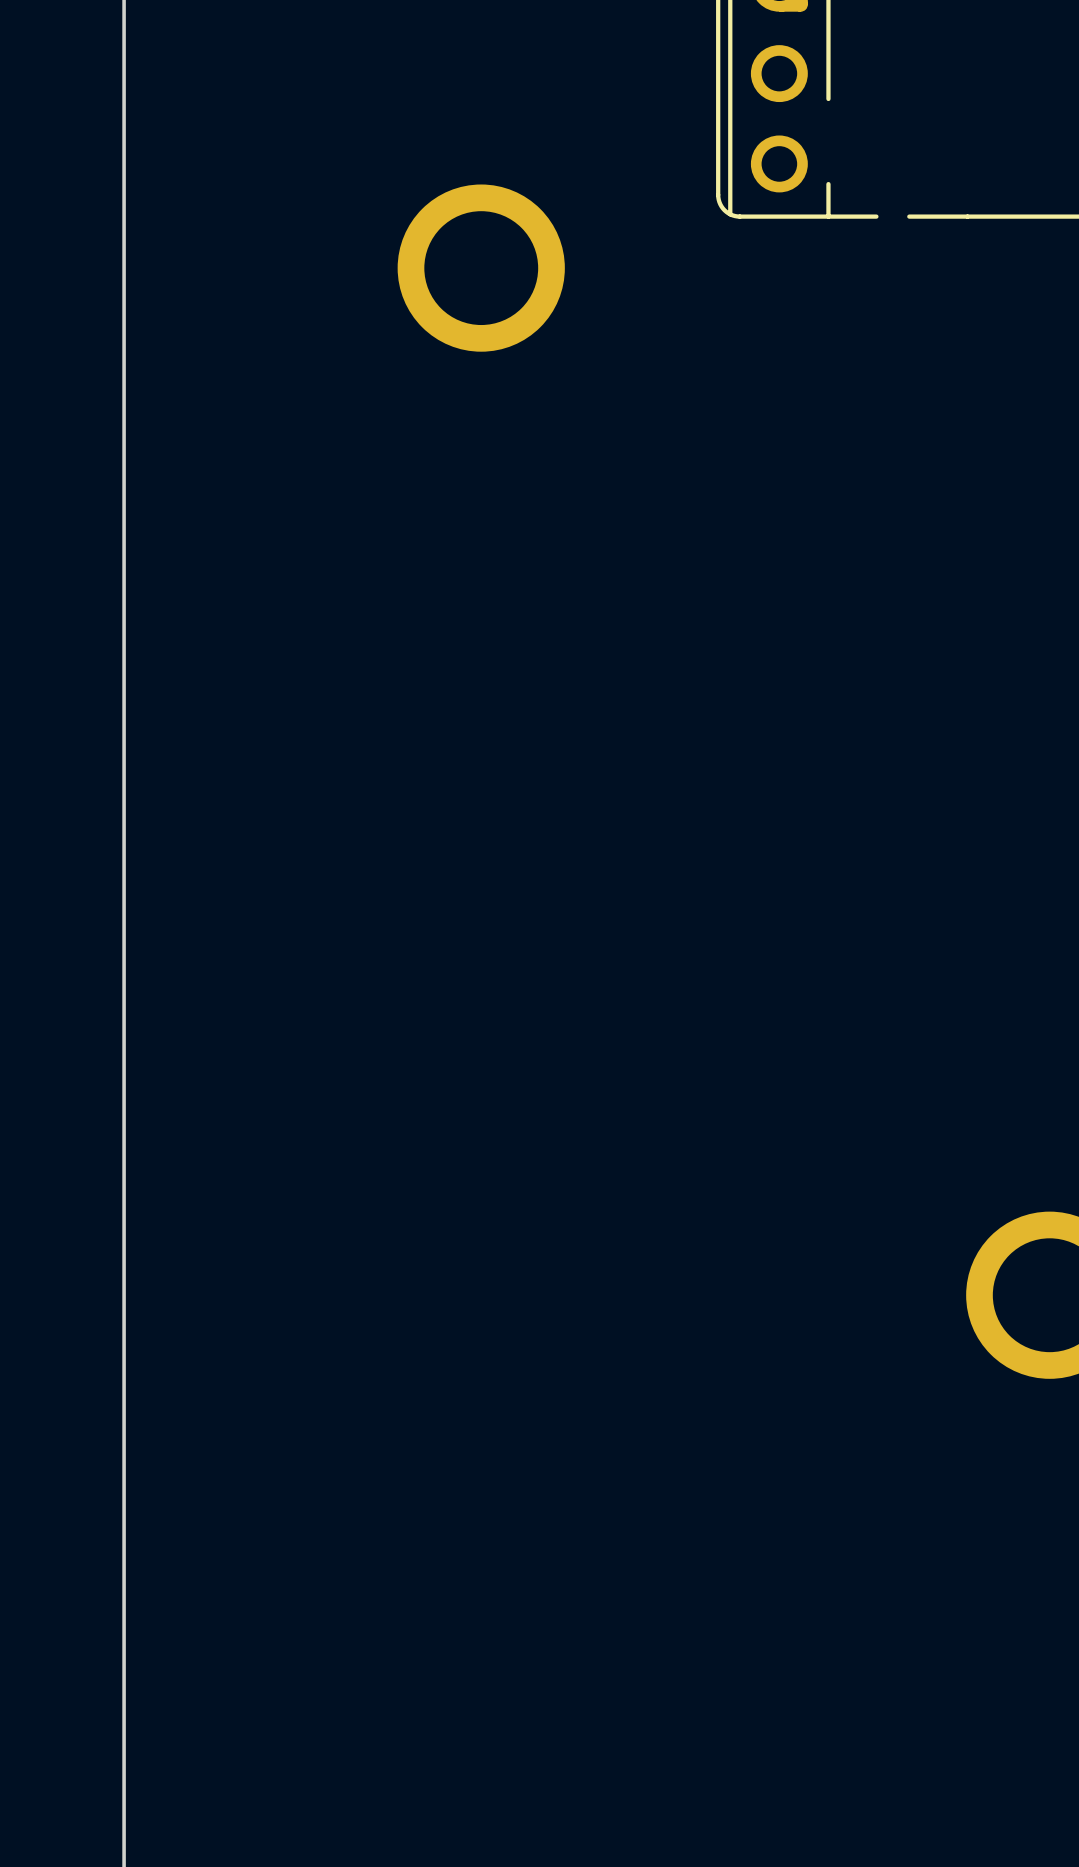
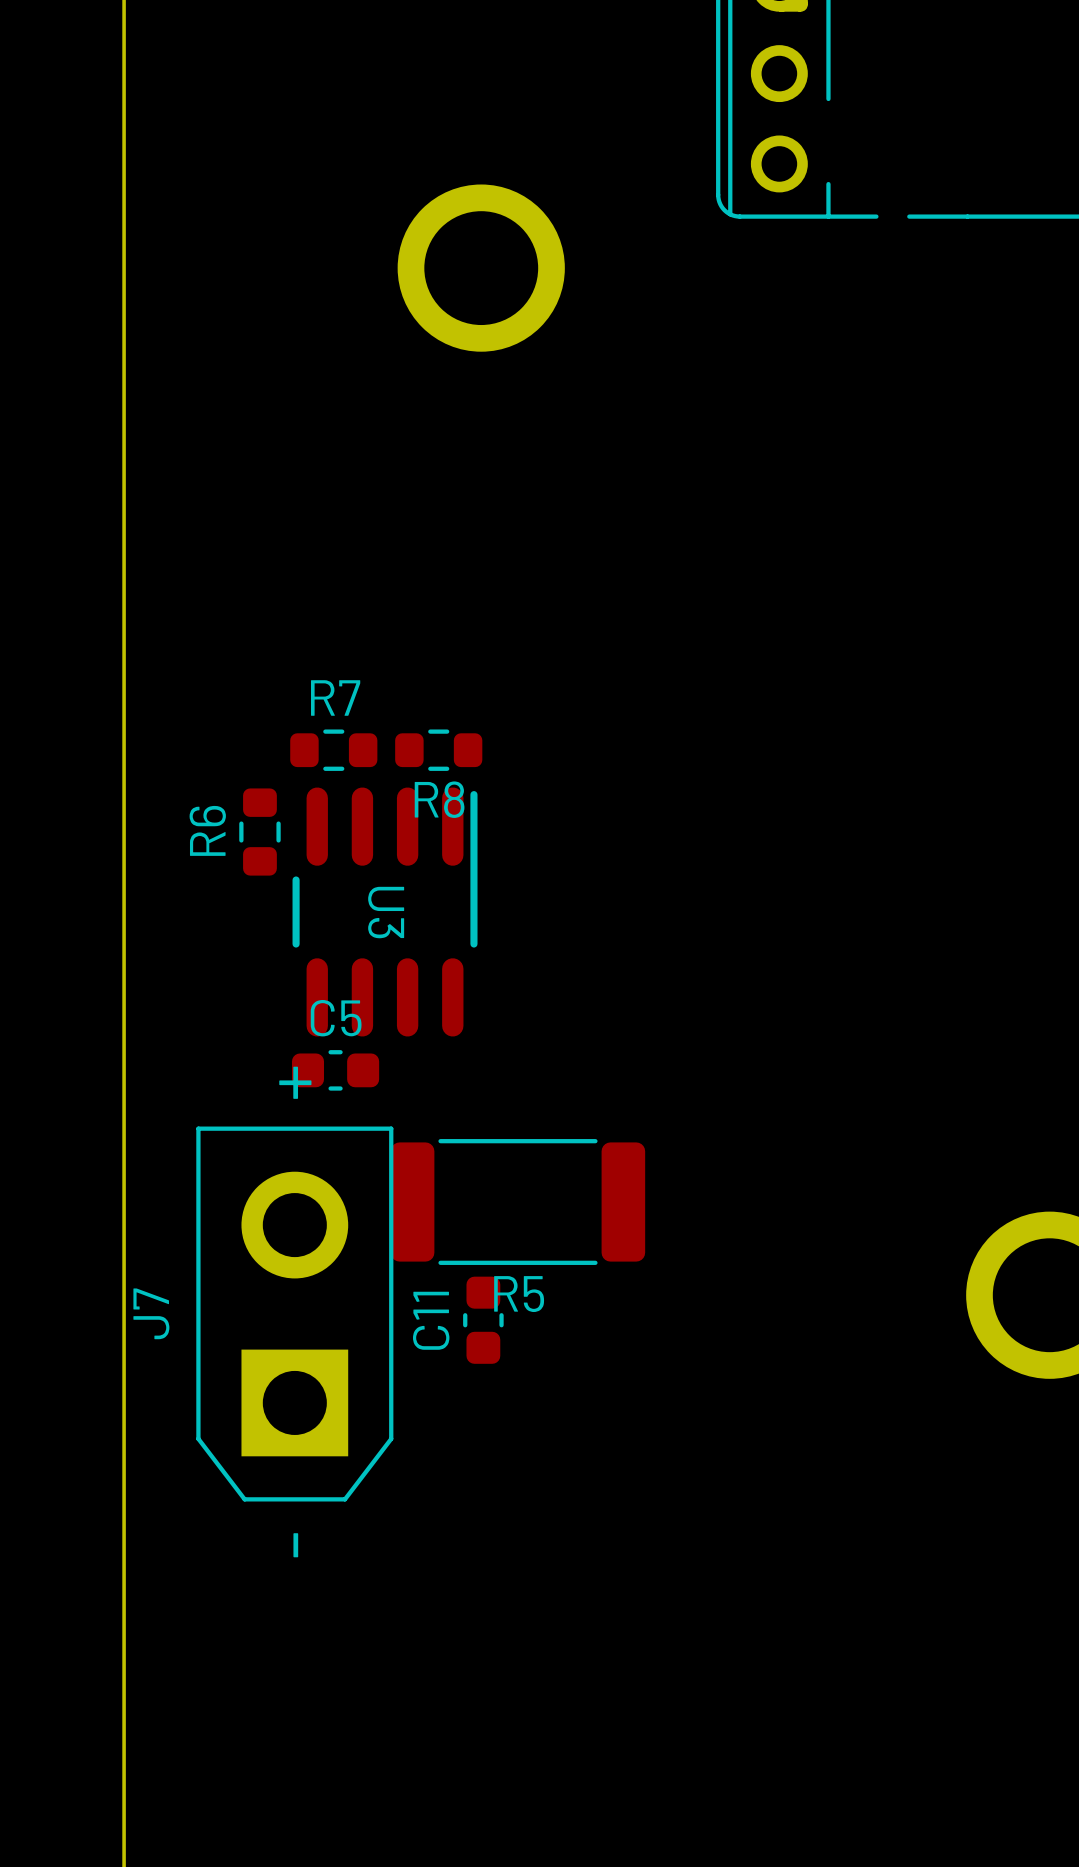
R7: none -> (333, 750)
R8: none -> (438, 750)
R6: none -> (259, 832)
U3: none -> (385, 912)
C5: none -> (335, 1070)
R5: none -> (517, 1202)
J7: none -> (294, 1314)
C11: none -> (483, 1320)

